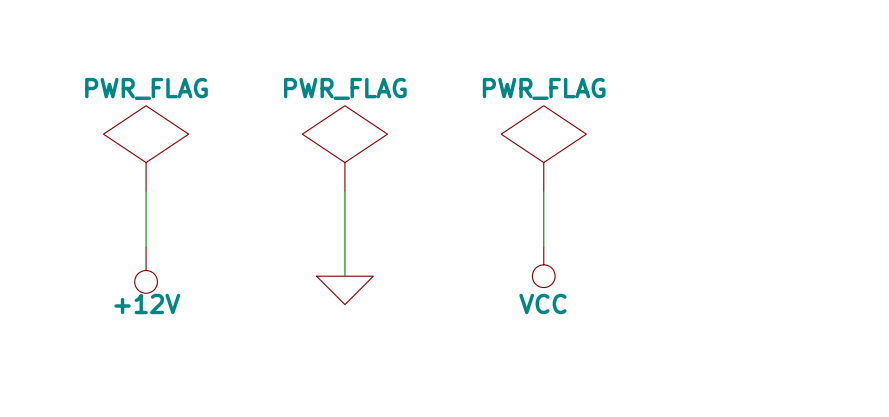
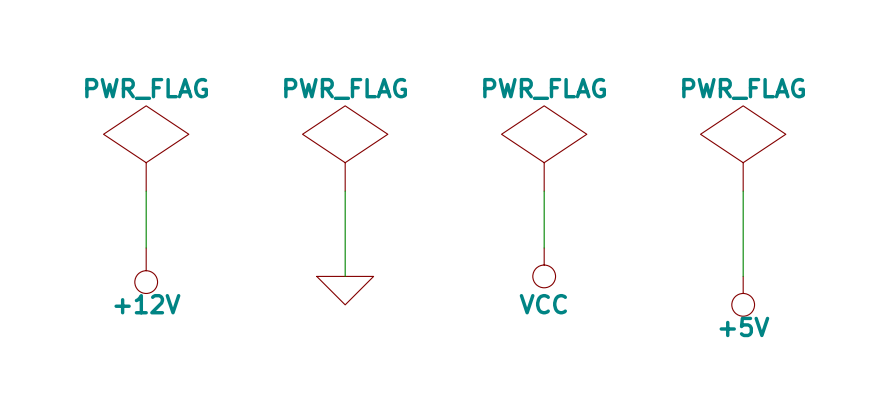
power symbol: none -> PWR_FLAG (743, 148)
wire: none -> (743, 191) (743, 276)
power symbol: none -> +5V (743, 296)

